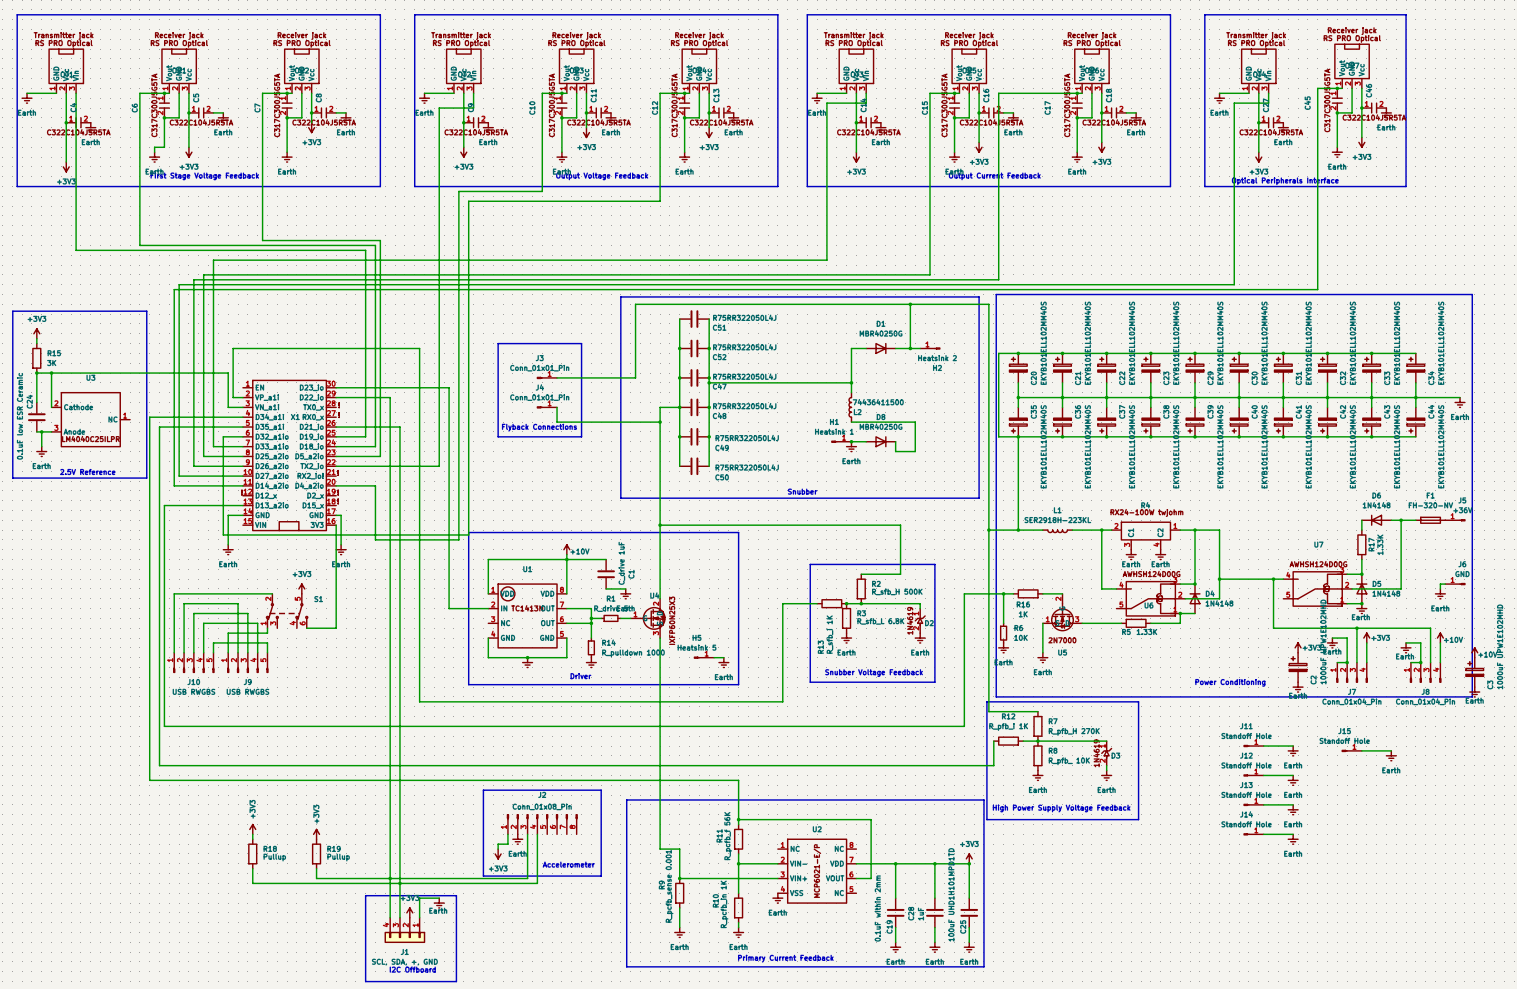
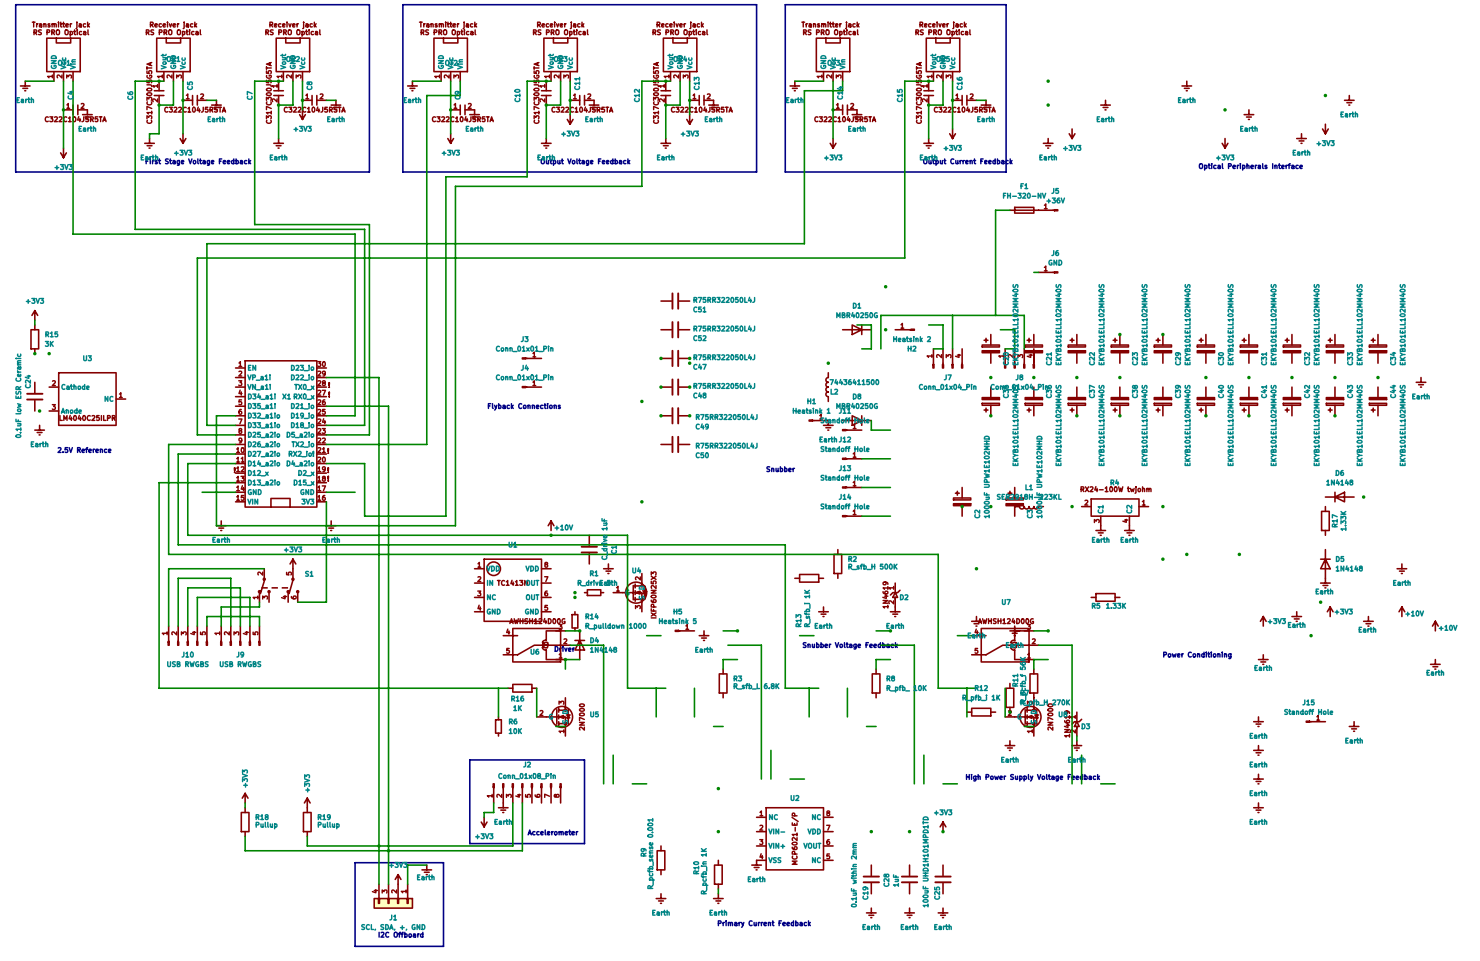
line: (1034, 14) (1170, 14) (1170, 186) (1034, 186) -> (1006, 4) (1006, 172)
line: (1204, 14) (1406, 14) (1406, 186) (1204, 186) (1204, 14) -> none
part: (1352, 66) -> none
part: (1091, 71) -> none
part: (1258, 71) -> none
junction: (1337, 88) -> none
wire: (1342, 88) (1317, 88) (1317, 289) (1067, 289) -> none
wire: (1352, 88) (1352, 112) (1337, 112) (1337, 147) -> none
wire: (1361, 88) (1361, 137) -> none
wire: (1082, 93) (998, 93) (998, 279) (193, 279) (193, 466) -> none
wire: (1091, 93) (1091, 117) (1077, 117) (1077, 152) -> none
wire: (1101, 93) (1101, 142) -> none
wire: (1219, 93) (1248, 93) -> none
wire: (1258, 93) (1258, 152) -> none
wire: (1268, 93) (1268, 103) (1234, 103) (1234, 284) (179, 284) (179, 476) (184, 476) -> (818, 688) (785, 688) (785, 544) (178, 544) (178, 454)
part: (1337, 100) -> none
part: (1077, 105) -> none
part: (1374, 108) -> none
junction: (1101, 112) -> none
part: (1114, 112) -> none
wire: (1126, 112) (1136, 112) -> none
junction: (1337, 112) -> none
part: (1271, 122) -> none
wire: none -> (1009, 210) (995, 210) (995, 315)
wire: (1062, 289) (174, 289) (174, 466) -> (187, 444) (168, 444)
line: (996, 294) (1472, 294) (1472, 696) (996, 696) (996, 294) -> none
line: (620, 296) (979, 296) (979, 498) (620, 498) (620, 296) -> none
wire: (910, 304) (910, 348) -> none
line: (12, 311) (146, 311) (146, 478) (12, 478) (12, 311) -> none
wire: (679, 319) (679, 466) -> none
wire: (709, 319) (709, 466) -> none
line: (498, 343) (581, 343) (581, 436) (498, 436) (498, 343) -> none
wire: none -> (856, 324) (871, 324) (871, 348) (861, 348)
wire: none -> (928, 324) (943, 324) (943, 348) (933, 348)
junction: (679, 348) -> none
junction: (709, 348) -> none
wire: (866, 348) (851, 348) (851, 392) -> none
wire: (895, 348) (920, 348) -> none
wire: none -> (1000, 329) (1014, 329) (1014, 348) (1005, 348)
junction: (1018, 353) -> none
junction: (1062, 353) -> none
junction: (1106, 353) -> none
junction: (1239, 353) -> none
junction: (1283, 353) -> none
junction: (1327, 353) -> none
junction: (1371, 353) -> none
wire: (1415, 353) (998, 353) (998, 436) (1415, 436) -> none
wire: none -> (880, 348) (880, 315) (1024, 315) (1024, 348)
wire: (51, 373) (51, 407) -> none
wire: (557, 377) (635, 377) (635, 304) (988, 304) (988, 711) (1037, 711) -> none
wire: (709, 382) (851, 382) -> none
wire: (1018, 382) (1018, 407) -> none
wire: (1062, 382) (1062, 407) -> none
wire: (1106, 382) (1106, 407) -> none
wire: (1150, 382) (1150, 407) -> none
wire: (1195, 382) (1195, 407) -> none
wire: (1239, 382) (1239, 407) -> none
wire: (1283, 382) (1283, 407) -> none
wire: (1327, 382) (1327, 407) -> none
wire: (1371, 382) (1371, 407) -> none
wire: (1415, 382) (1415, 407) -> none
wire: (336, 387) (449, 387) (449, 608) (488, 608) -> none
wire: (242, 397) (233, 397) (233, 348) (419, 348) (419, 701) (782, 701) -> (761, 779) (761, 673)
wire: (1018, 397) (1460, 397) -> none
wire: (36, 402) (36, 373) (228, 373) (228, 407) (242, 407) -> none
wire: (557, 407) (557, 422) (660, 422) -> none
wire: (679, 407) (660, 407) (660, 598) -> none
wire: (242, 417) (149, 417) (149, 780) (738, 780) (738, 824) -> none
wire: (851, 422) (915, 422) (915, 451) -> none
wire: (242, 427) (159, 427) (159, 765) (993, 765) (993, 746) -> none
wire: (36, 431) (51, 431) -> none
wire: (41, 431) (41, 446) -> none
wire: (1018, 436) (1018, 530) -> none
junction: (1062, 436) -> none
junction: (1195, 436) -> none
junction: (1327, 436) -> none
junction: (851, 441) -> none
wire: none -> (861, 458) (890, 458)
wire: (174, 485) (193, 485) -> (168, 463) (168, 554) (938, 554) (938, 568)
wire: none -> (861, 487) (890, 487)
wire: (228, 515) (228, 544) -> (221, 492) (202, 492)
wire: (341, 515) (341, 544) -> (331, 492) (355, 492)
wire: (1361, 520) (1361, 530) -> none
wire: (1391, 520) (1415, 520) -> none
wire: (1401, 520) (1401, 588) (1352, 588) -> none
part position: (1430, 520) -> (1024, 210)
part position: (1455, 520) -> (1048, 210)
wire: (660, 525) (900, 525) (900, 574) (861, 574) -> none
wire: (988, 530) (1042, 530) -> none
wire: (1072, 530) (1111, 530) -> none
wire: (1101, 530) (1101, 588) (1116, 588) -> none
wire: (1180, 530) (1219, 530) (1219, 598) (1185, 598) -> none
wire: (1195, 530) (1195, 584) (1180, 584) -> none
line: (468, 532) (738, 532) (738, 684) (468, 684) (468, 532) -> none
wire: (223, 534) (468, 534) -> (216, 511) (216, 525) (455, 525) (455, 511)
wire: none -> (861, 516) (890, 516)
wire: (566, 554) (566, 593) -> none
wire: (488, 559) (488, 593) -> (474, 535) (187, 535) (187, 463)
wire: none -> (589, 535) (627, 535) (627, 688) (665, 688)
wire: (1361, 559) (1361, 574) (1347, 574) -> none
line: (810, 564) (934, 564) (934, 682) (810, 682) (810, 564) -> none
junction: (1361, 574) -> none
wire: (1219, 579) (1283, 579) -> none
wire: (1273, 579) (1273, 628) (1430, 628) (1430, 662) -> none
wire: (1445, 584) (1440, 584) (1440, 588) -> none
part position: (1455, 584) -> (1048, 272)
wire: (606, 588) (625, 588) -> none
part position: (1317, 588) -> (1005, 645)
wire: (964, 593) (1013, 593) -> none
wire: (1003, 593) (1003, 623) -> none
part position: (1028, 593) -> (522, 688)
wire: (1042, 593) (1062, 593) -> none
part position: (1150, 598) -> (536, 645)
part position: (1195, 598) -> (579, 645)
wire: (817, 603) (782, 603) (782, 672) -> (727, 645) (761, 645)
wire: (846, 603) (920, 603) (920, 608) -> none
junction: (846, 603) -> none
junction: (861, 603) -> none
wire: (1347, 603) (1361, 603) -> none
junction: (1361, 603) -> none
wire: (566, 608) (591, 608) (591, 638) -> none
part position: (1062, 612) -> (554, 716)
junction: (1180, 613) -> none
wire: (1195, 613) (1180, 613) (1180, 623) (1150, 623) -> none
part rotation: 0° (1062, 617) -> 90° counterclockwise (559, 716)
wire: (591, 618) (601, 618) -> none
wire: (620, 618) (630, 618) -> none
part position: (846, 618) -> (723, 683)
wire: (566, 623) (591, 623) -> none
wire: (1042, 623) (1042, 652) -> (1005, 688) (1005, 716)
wire: (1082, 623) (1121, 623) -> none
wire: (1356, 628) (1356, 662) -> none
part position: (1003, 633) -> (498, 726)
wire: (488, 638) (488, 657) (566, 657) (566, 638) -> none
wire: (660, 638) (660, 849) (679, 849) (679, 878) (777, 878) -> none
wire: (1332, 638) (1347, 638) (1347, 662) (1337, 662) -> none
wire: (1366, 642) (1366, 662) -> none
wire: (1406, 642) (1420, 642) (1420, 662) (1410, 662) -> none
wire: (1440, 642) (1440, 662) -> none
junction: (527, 657) -> none
wire: none -> (565, 630) (579, 630)
junction: none -> (579, 630)
wire: (714, 657) (723, 657) -> none
wire: none -> (723, 630) (737, 630)
junction: none -> (737, 630)
wire: none -> (876, 630) (890, 630)
junction: none -> (890, 630)
wire: none -> (1033, 630) (1048, 630)
junction: none -> (1048, 630)
power symbol: (527, 662) -> none
power symbol: (591, 662) -> none
wire: none -> (646, 635) (660, 635)
wire: none -> (799, 635) (813, 635)
wire: none -> (957, 635) (971, 635)
junction: (1420, 662) -> none
part position: (1298, 667) -> (962, 501)
wire: none -> (570, 645) (603, 645) (603, 783)
wire: none -> (880, 645) (914, 645) (914, 783)
wire: none -> (1038, 645) (1072, 645) (1072, 783)
part position: (1352, 672) -> (947, 358)
part position: (1425, 672) -> (1019, 358)
part position: (1474, 672) -> (1014, 501)
junction: none -> (565, 659)
wire: none -> (579, 659) (565, 659) (565, 669)
wire: none -> (737, 659) (723, 659) (723, 669)
wire: none -> (890, 659) (876, 659) (876, 669)
wire: none -> (1048, 659) (1033, 659) (1033, 669)
line: (986, 701) (1138, 701) (1138, 819) (986, 819) (986, 701) -> none
wire: (164, 716) (164, 726) (964, 726) (964, 716) -> (159, 688) (508, 688)
wire: none -> (498, 688) (498, 716)
wire: none -> (536, 688) (536, 716)
wire: none -> (656, 688) (656, 716)
wire: none -> (694, 688) (694, 716)
wire: none -> (809, 688) (809, 716)
wire: none -> (847, 688) (847, 716)
wire: none -> (938, 688) (976, 688)
wire: none -> (966, 688) (966, 712)
wire: (1023, 741) (1106, 741) -> none
part: none -> (1023, 716)
part position: (1253, 746) -> (852, 430)
wire: (1263, 746) (1293, 746) -> none
wire: (1361, 750) (1391, 750) -> none
wire: none -> (555, 726) (565, 726)
wire: none -> (713, 726) (723, 726)
wire: none -> (866, 726) (876, 726)
part position: (1037, 755) -> (876, 683)
wire: none -> (1024, 726) (1033, 726)
part position: (1253, 775) -> (852, 458)
wire: (1263, 775) (1293, 775) -> none
wire: none -> (770, 750) (770, 779)
wire: none -> (613, 755) (613, 783)
wire: none -> (923, 755) (923, 783)
wire: none -> (1081, 755) (1081, 783)
line: (626, 799) (983, 799) (983, 966) (626, 966) (626, 799) -> none
part position: (1253, 804) -> (852, 487)
wire: (1263, 804) (1293, 804) -> none
wire: none -> (790, 779) (804, 779)
wire: none -> (632, 783) (646, 783)
wire: none -> (943, 783) (957, 783)
wire: none -> (1100, 783) (1115, 783)
wire: (738, 819) (871, 819) (871, 878) (856, 878) -> none
part position: (1253, 834) -> (852, 516)
wire: (1263, 834) (1293, 834) -> none
part position: (738, 839) -> (1033, 683)
wire: (738, 853) (738, 893) -> none
wire: (738, 863) (777, 863) -> none
wire: (856, 863) (969, 863) (969, 898) -> none
wire: (895, 863) (895, 898) -> none
wire: (934, 863) (934, 898) -> none
junction: (679, 878) -> none
wire: (679, 907) (679, 927) -> none
wire: (895, 927) (895, 942) -> none
wire: (934, 927) (934, 942) -> none
wire: (969, 927) (969, 942) -> none

